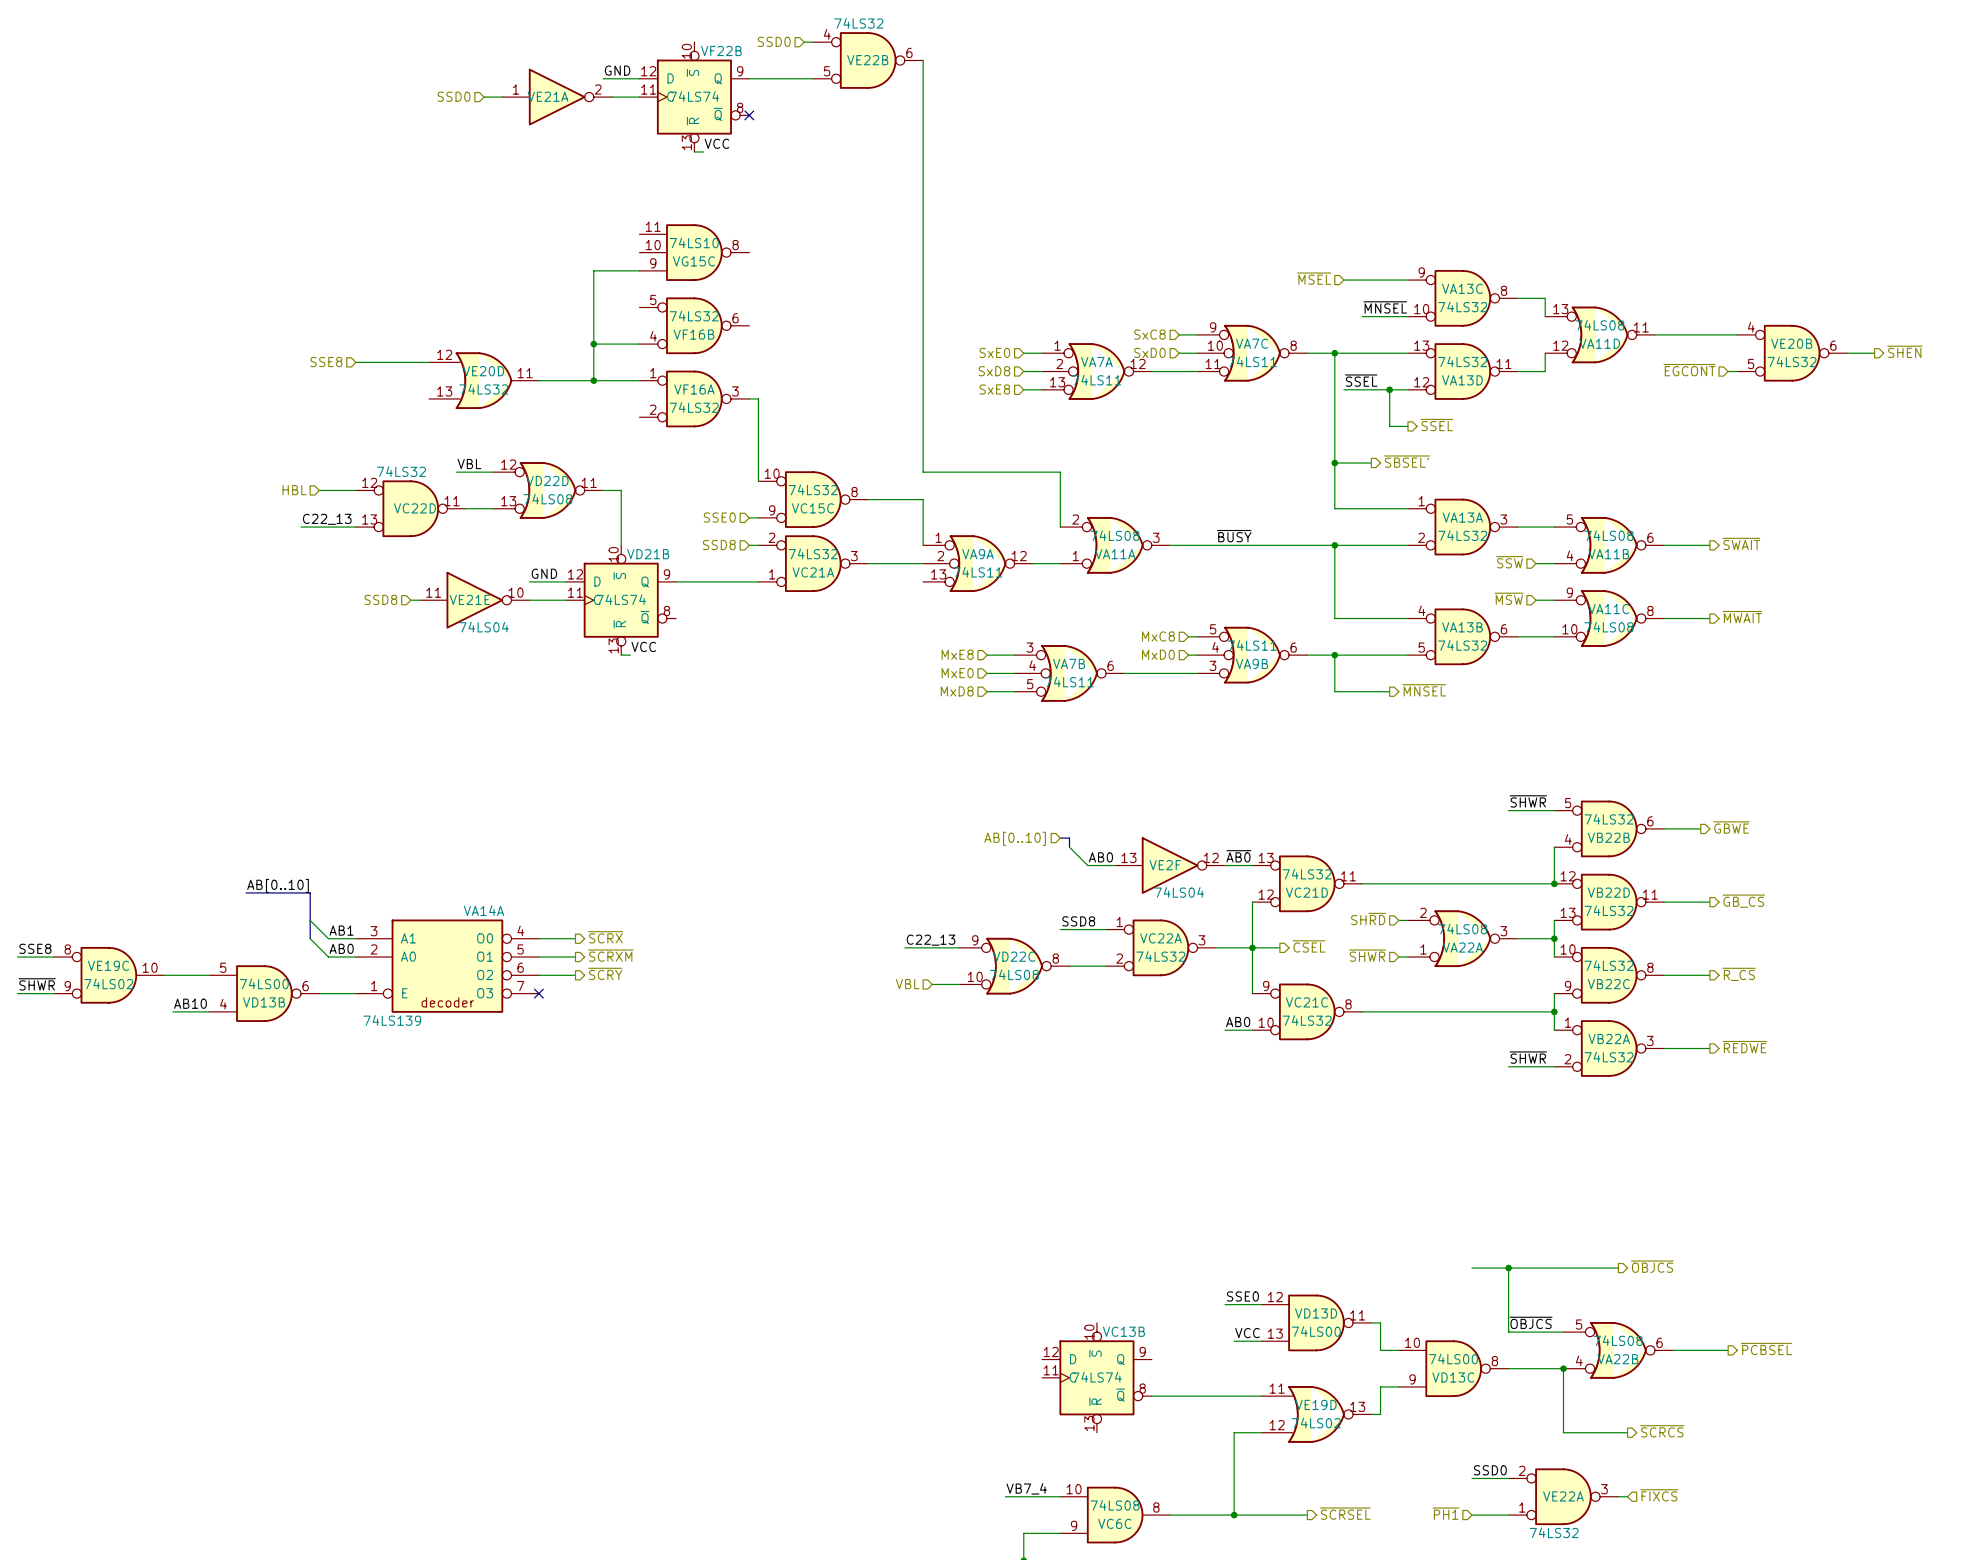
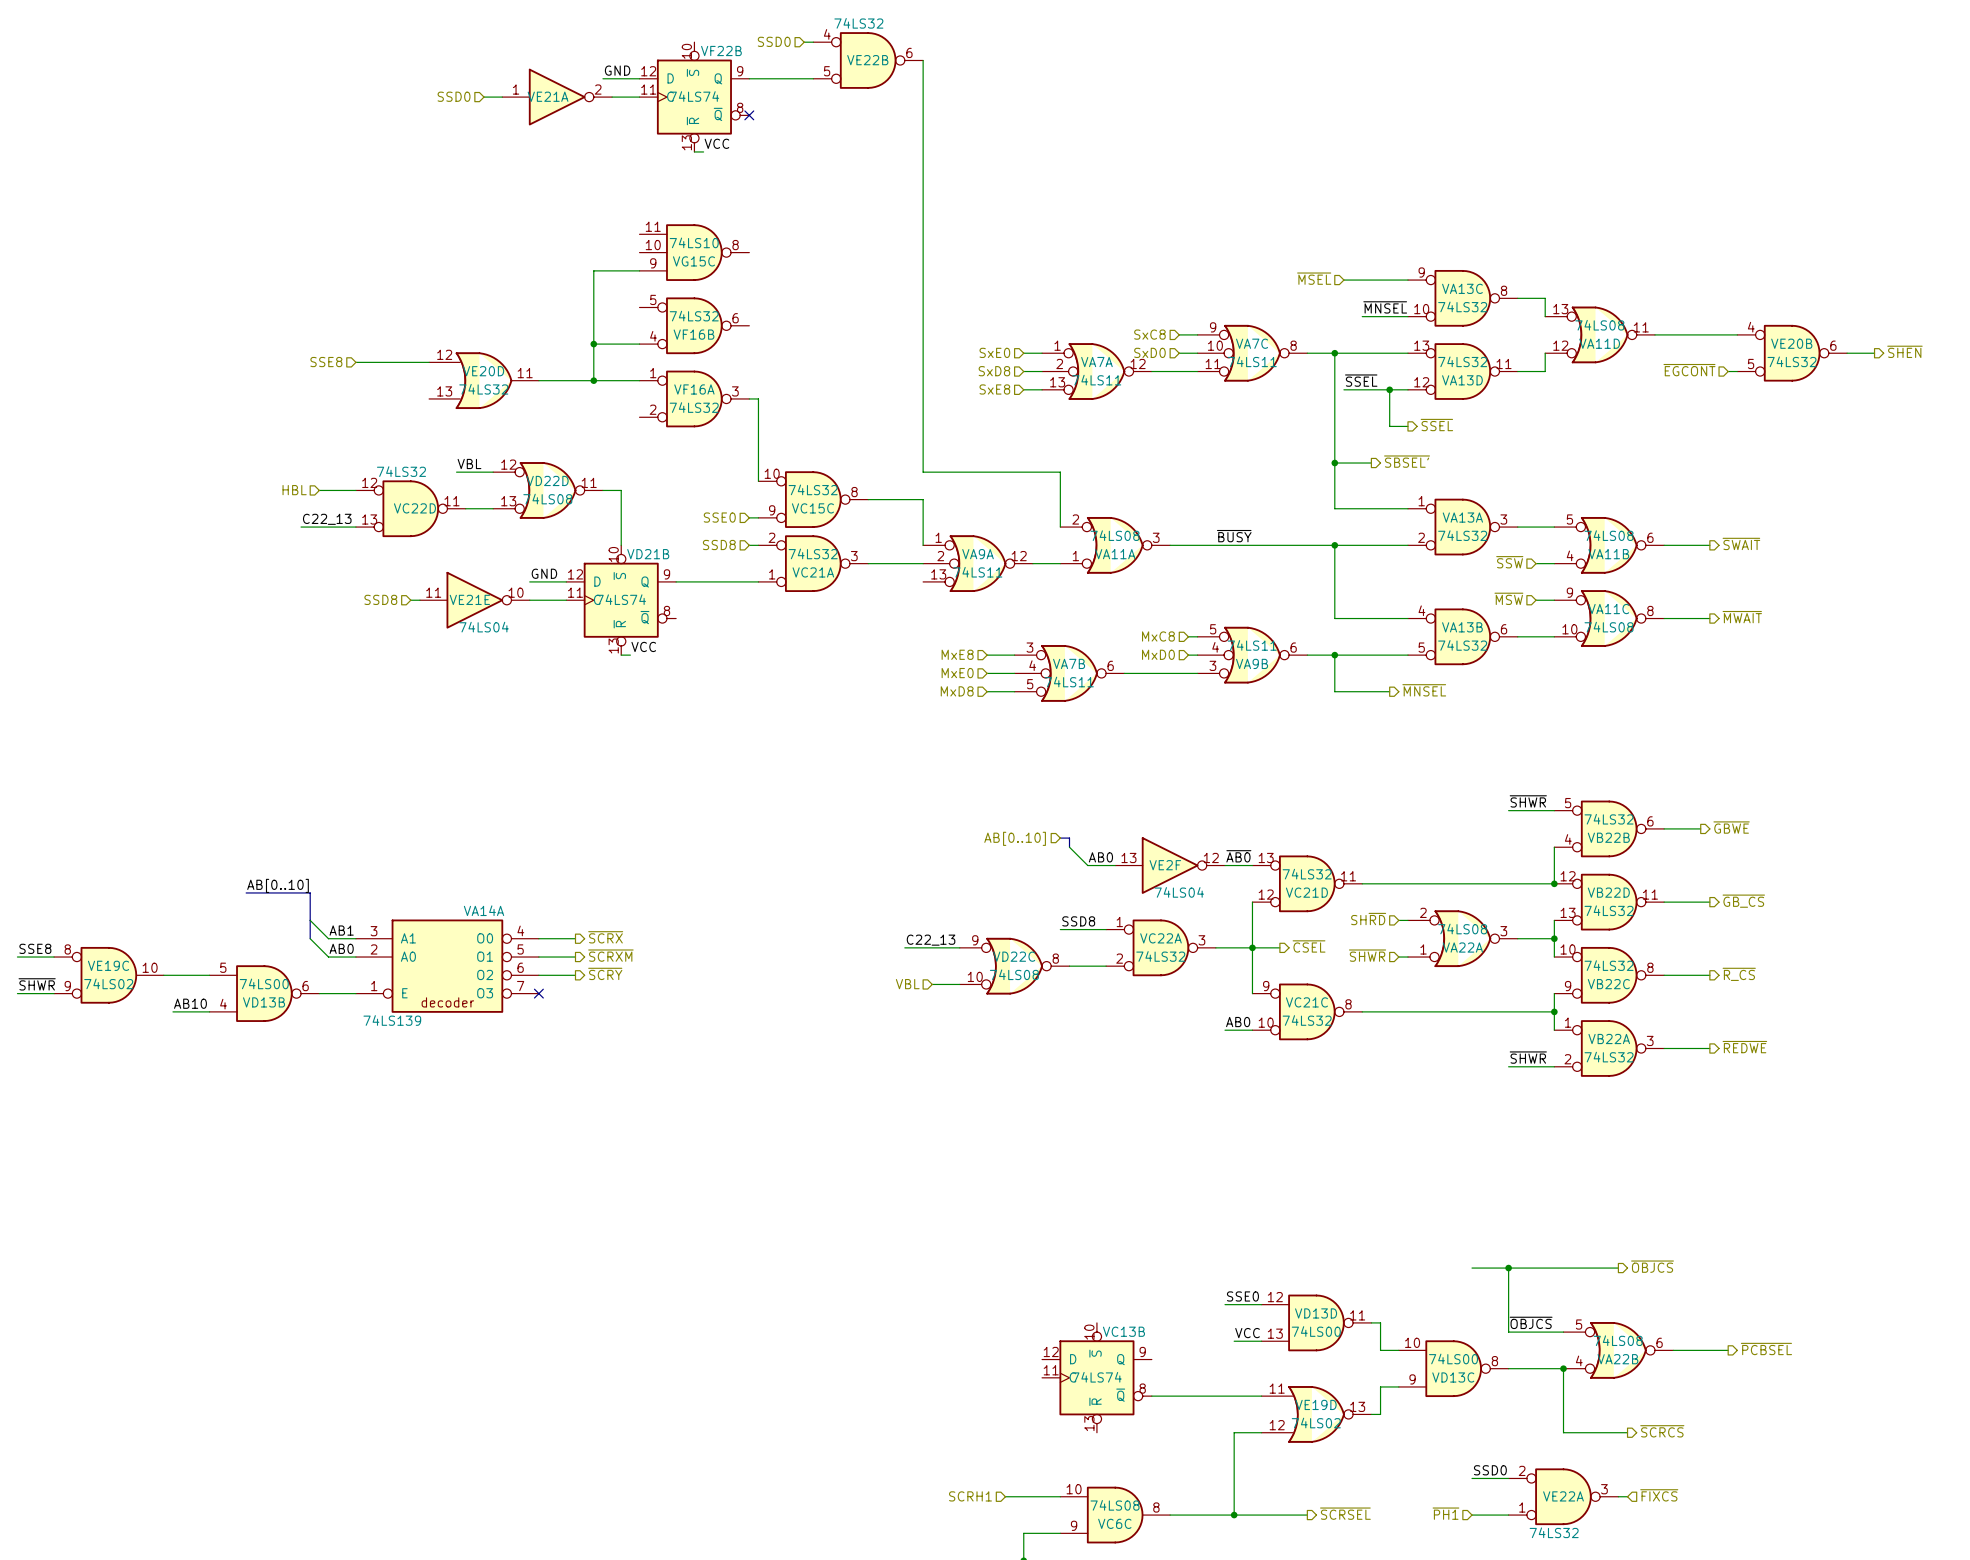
label: VB7_4 (1026, 1488) -> none
hierarchical label: none -> SCRH1 (970, 1496)

